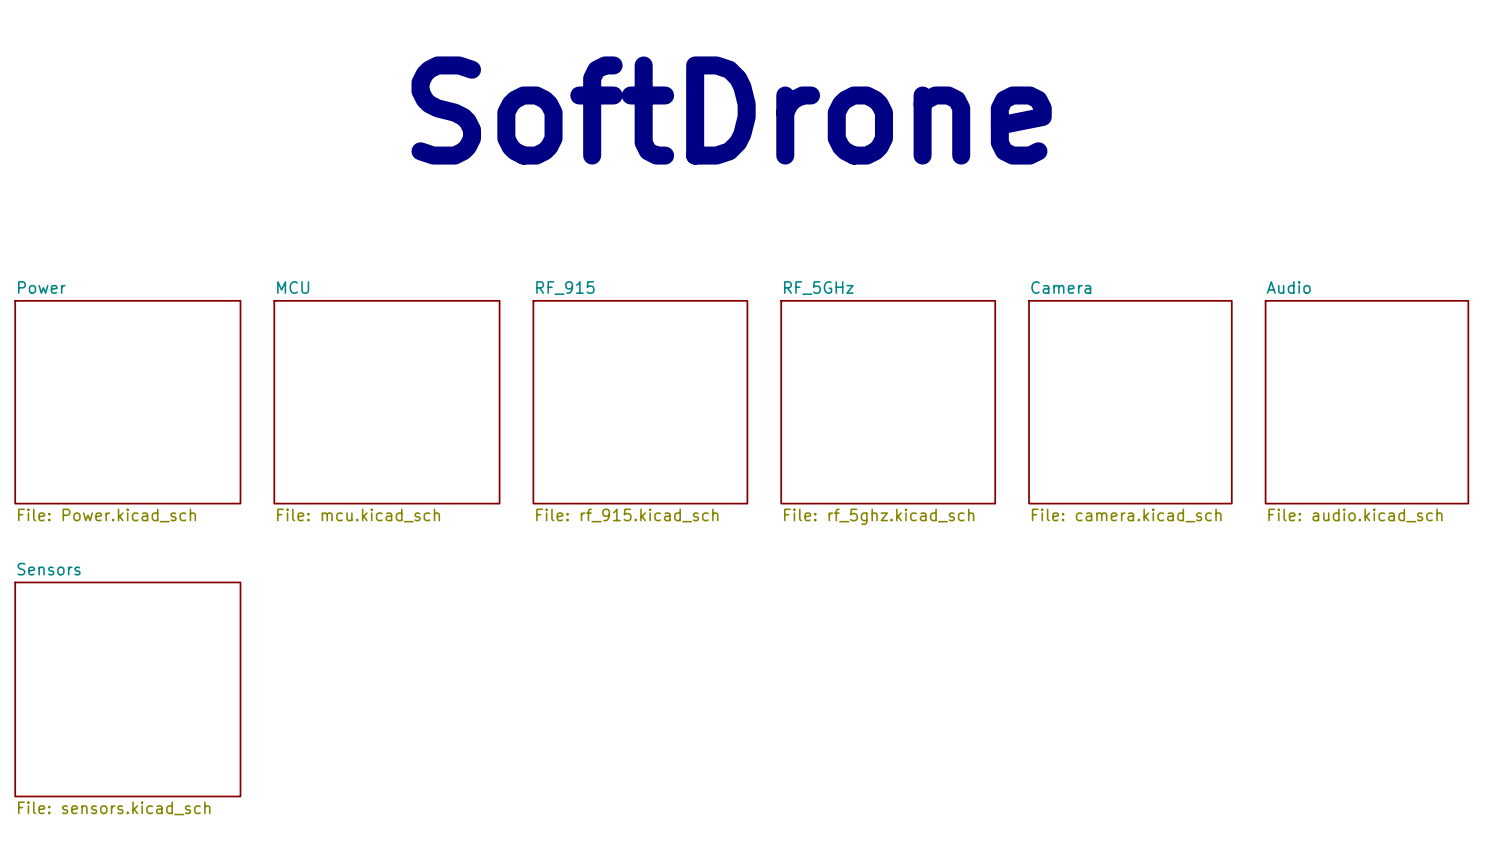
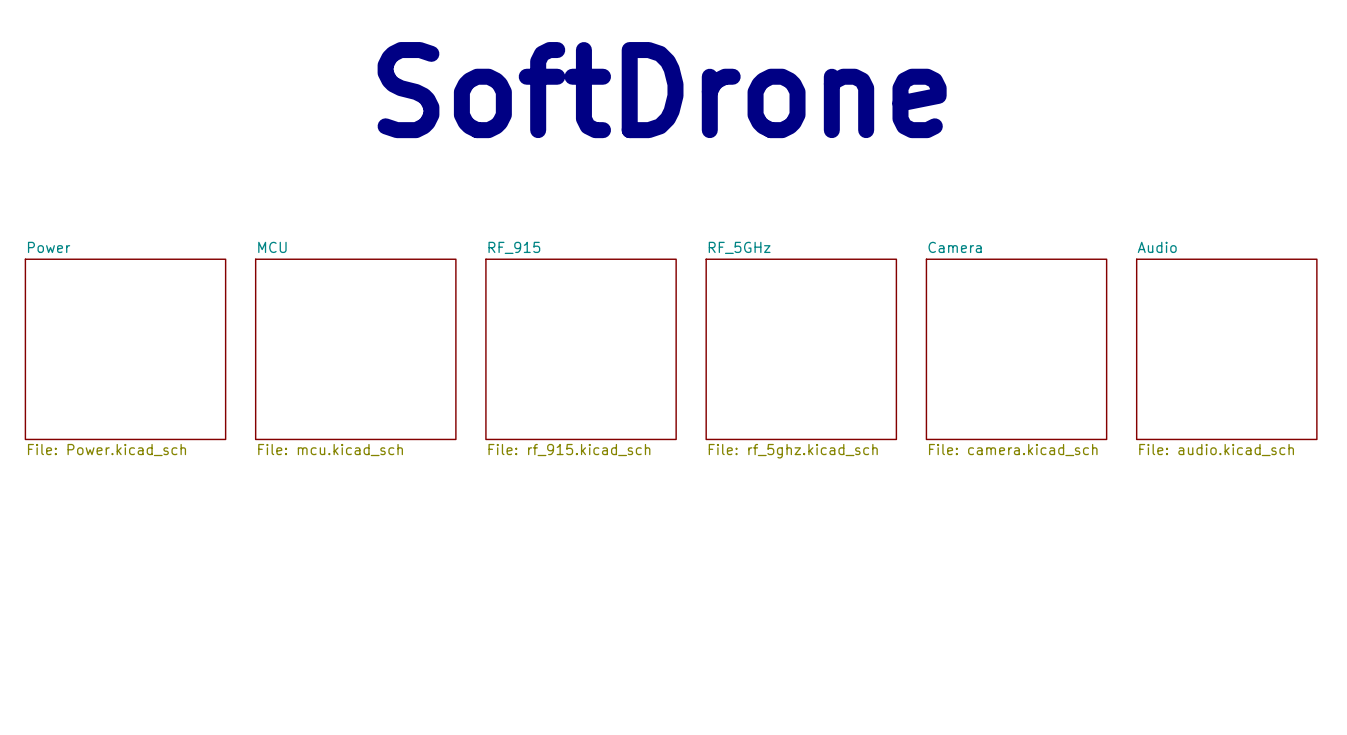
sheet Sensors: File: sensors.kicad_sch (127, 689) -> none

